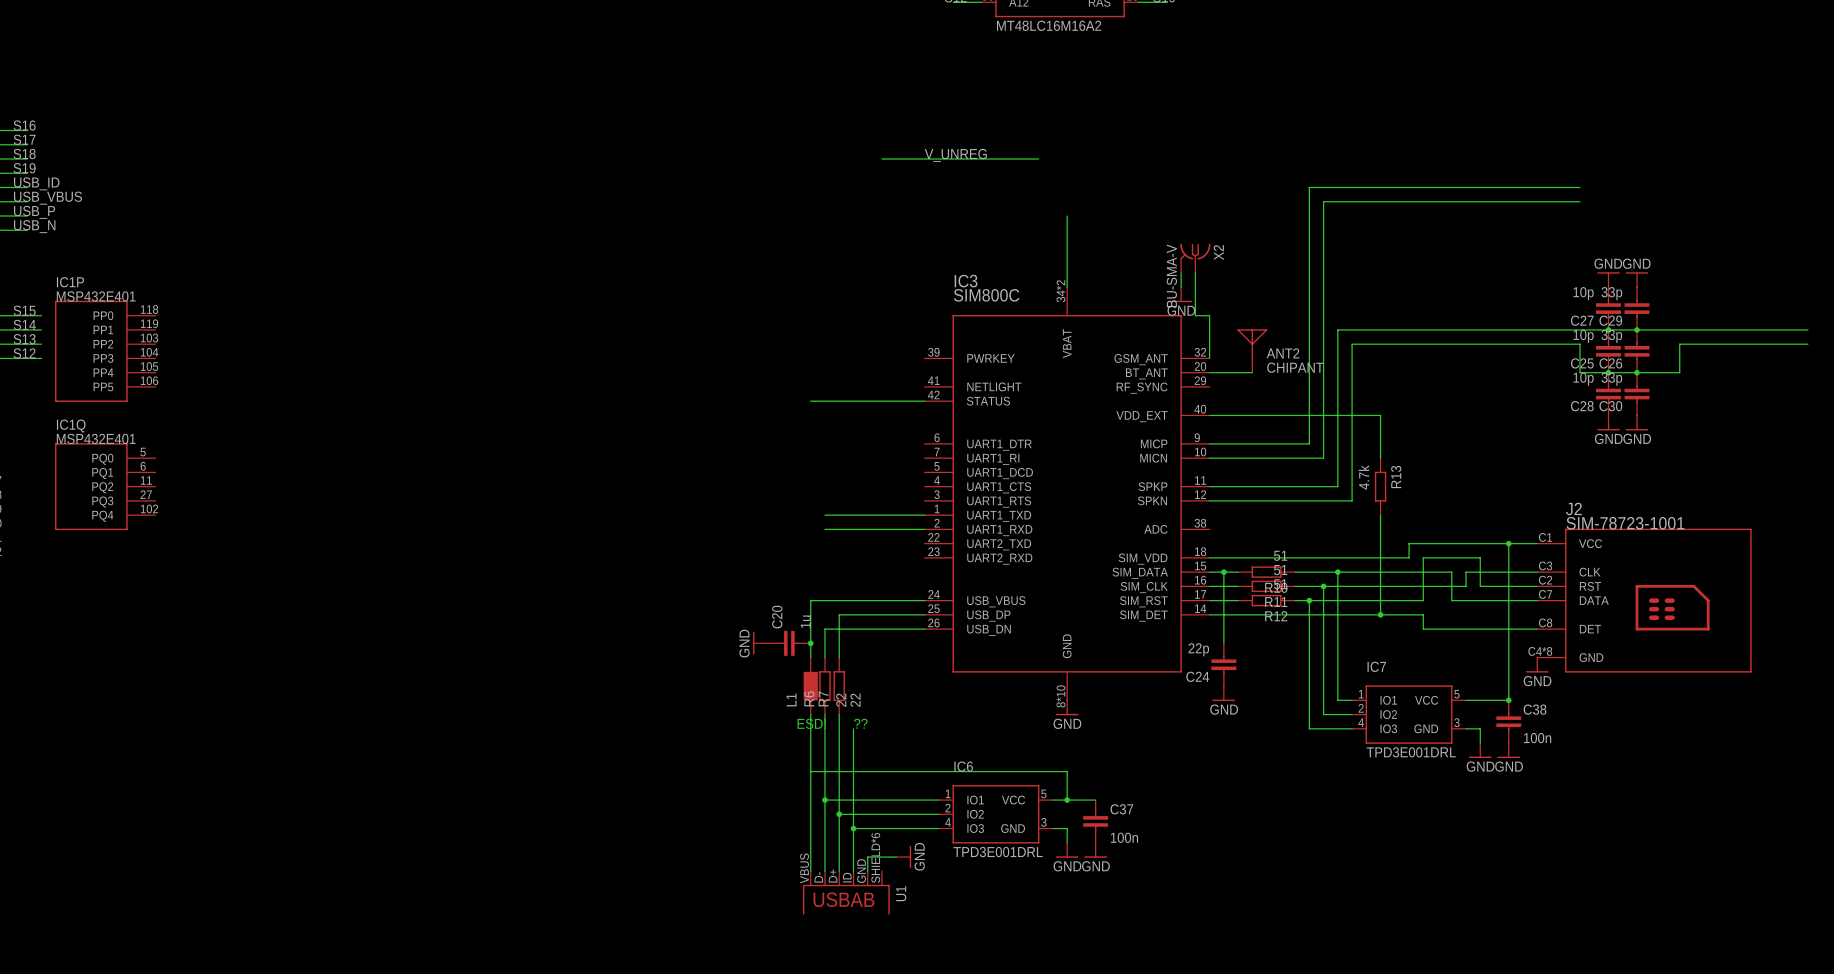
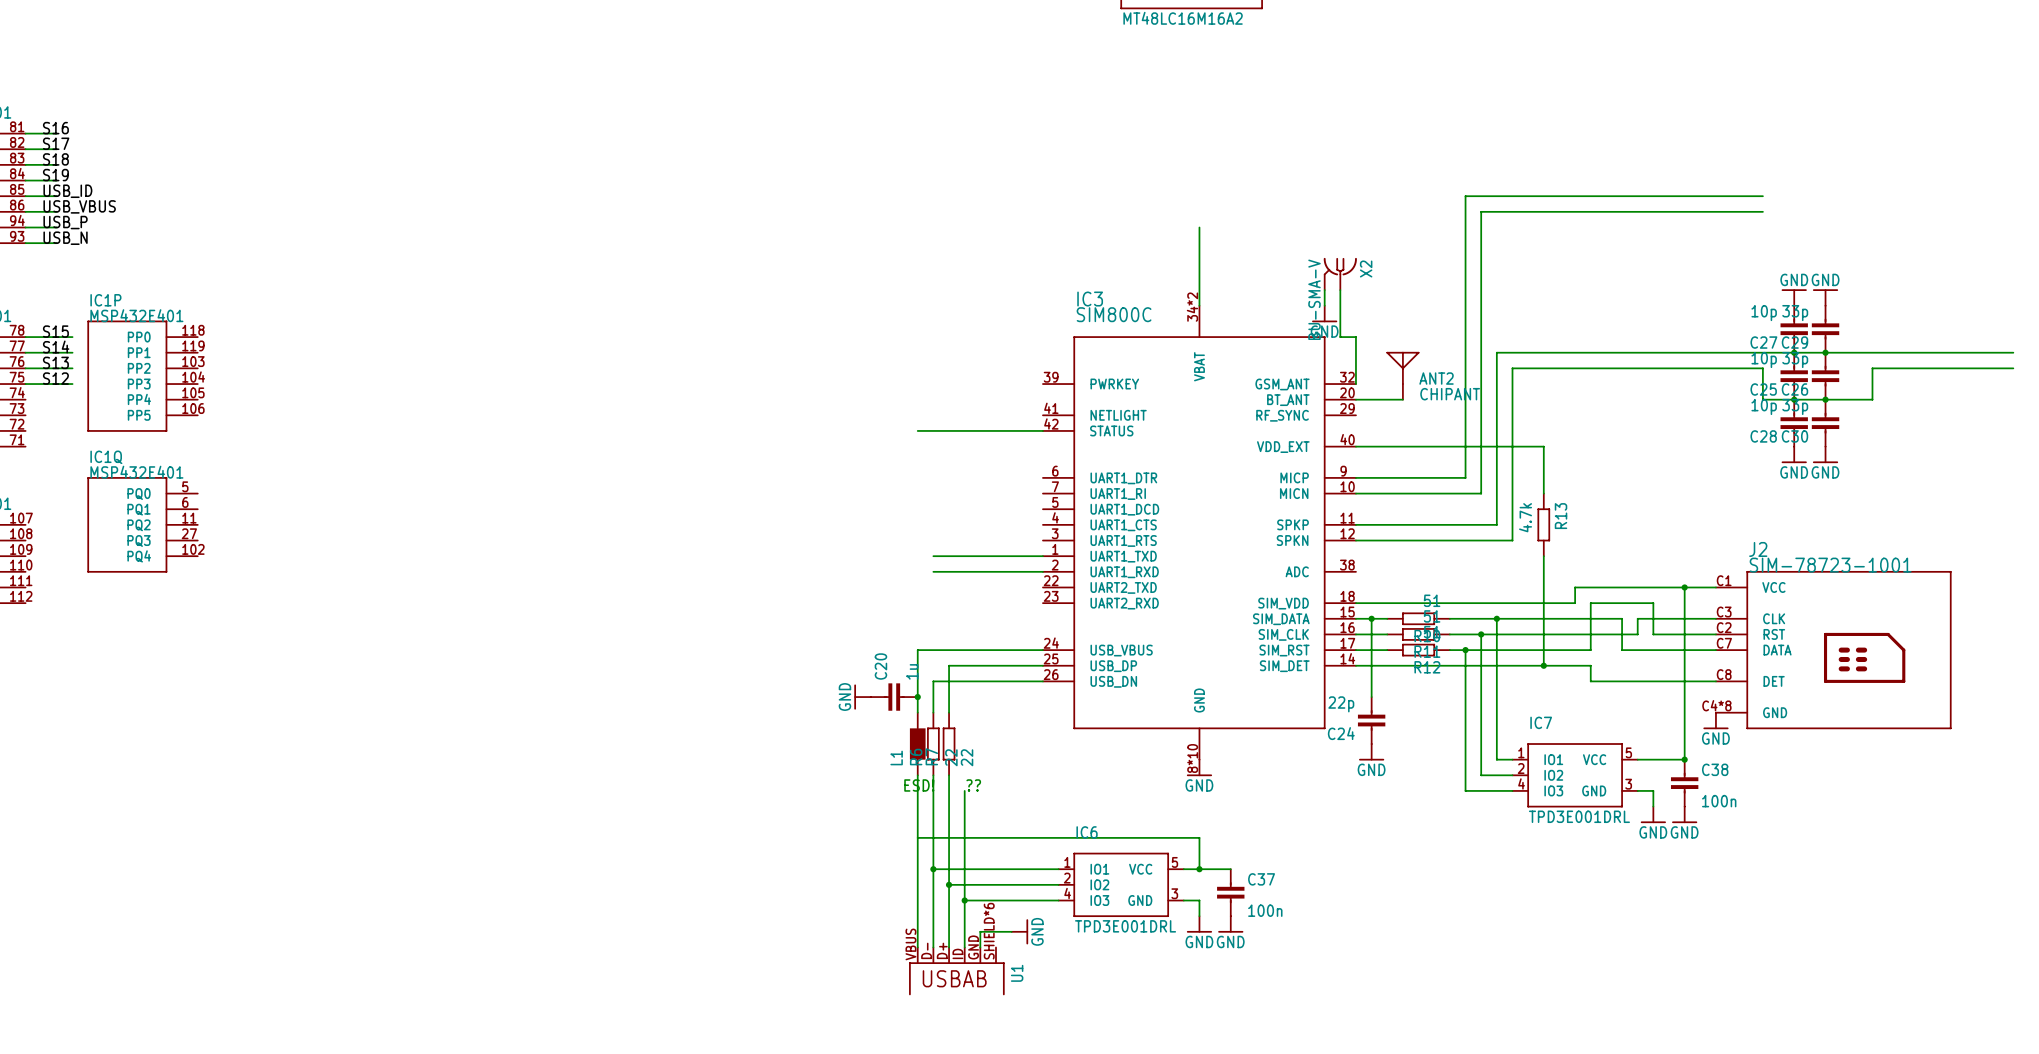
label: V_UNREG (955, 155) -> none
wire: (881, 159) (1038, 159) -> none

